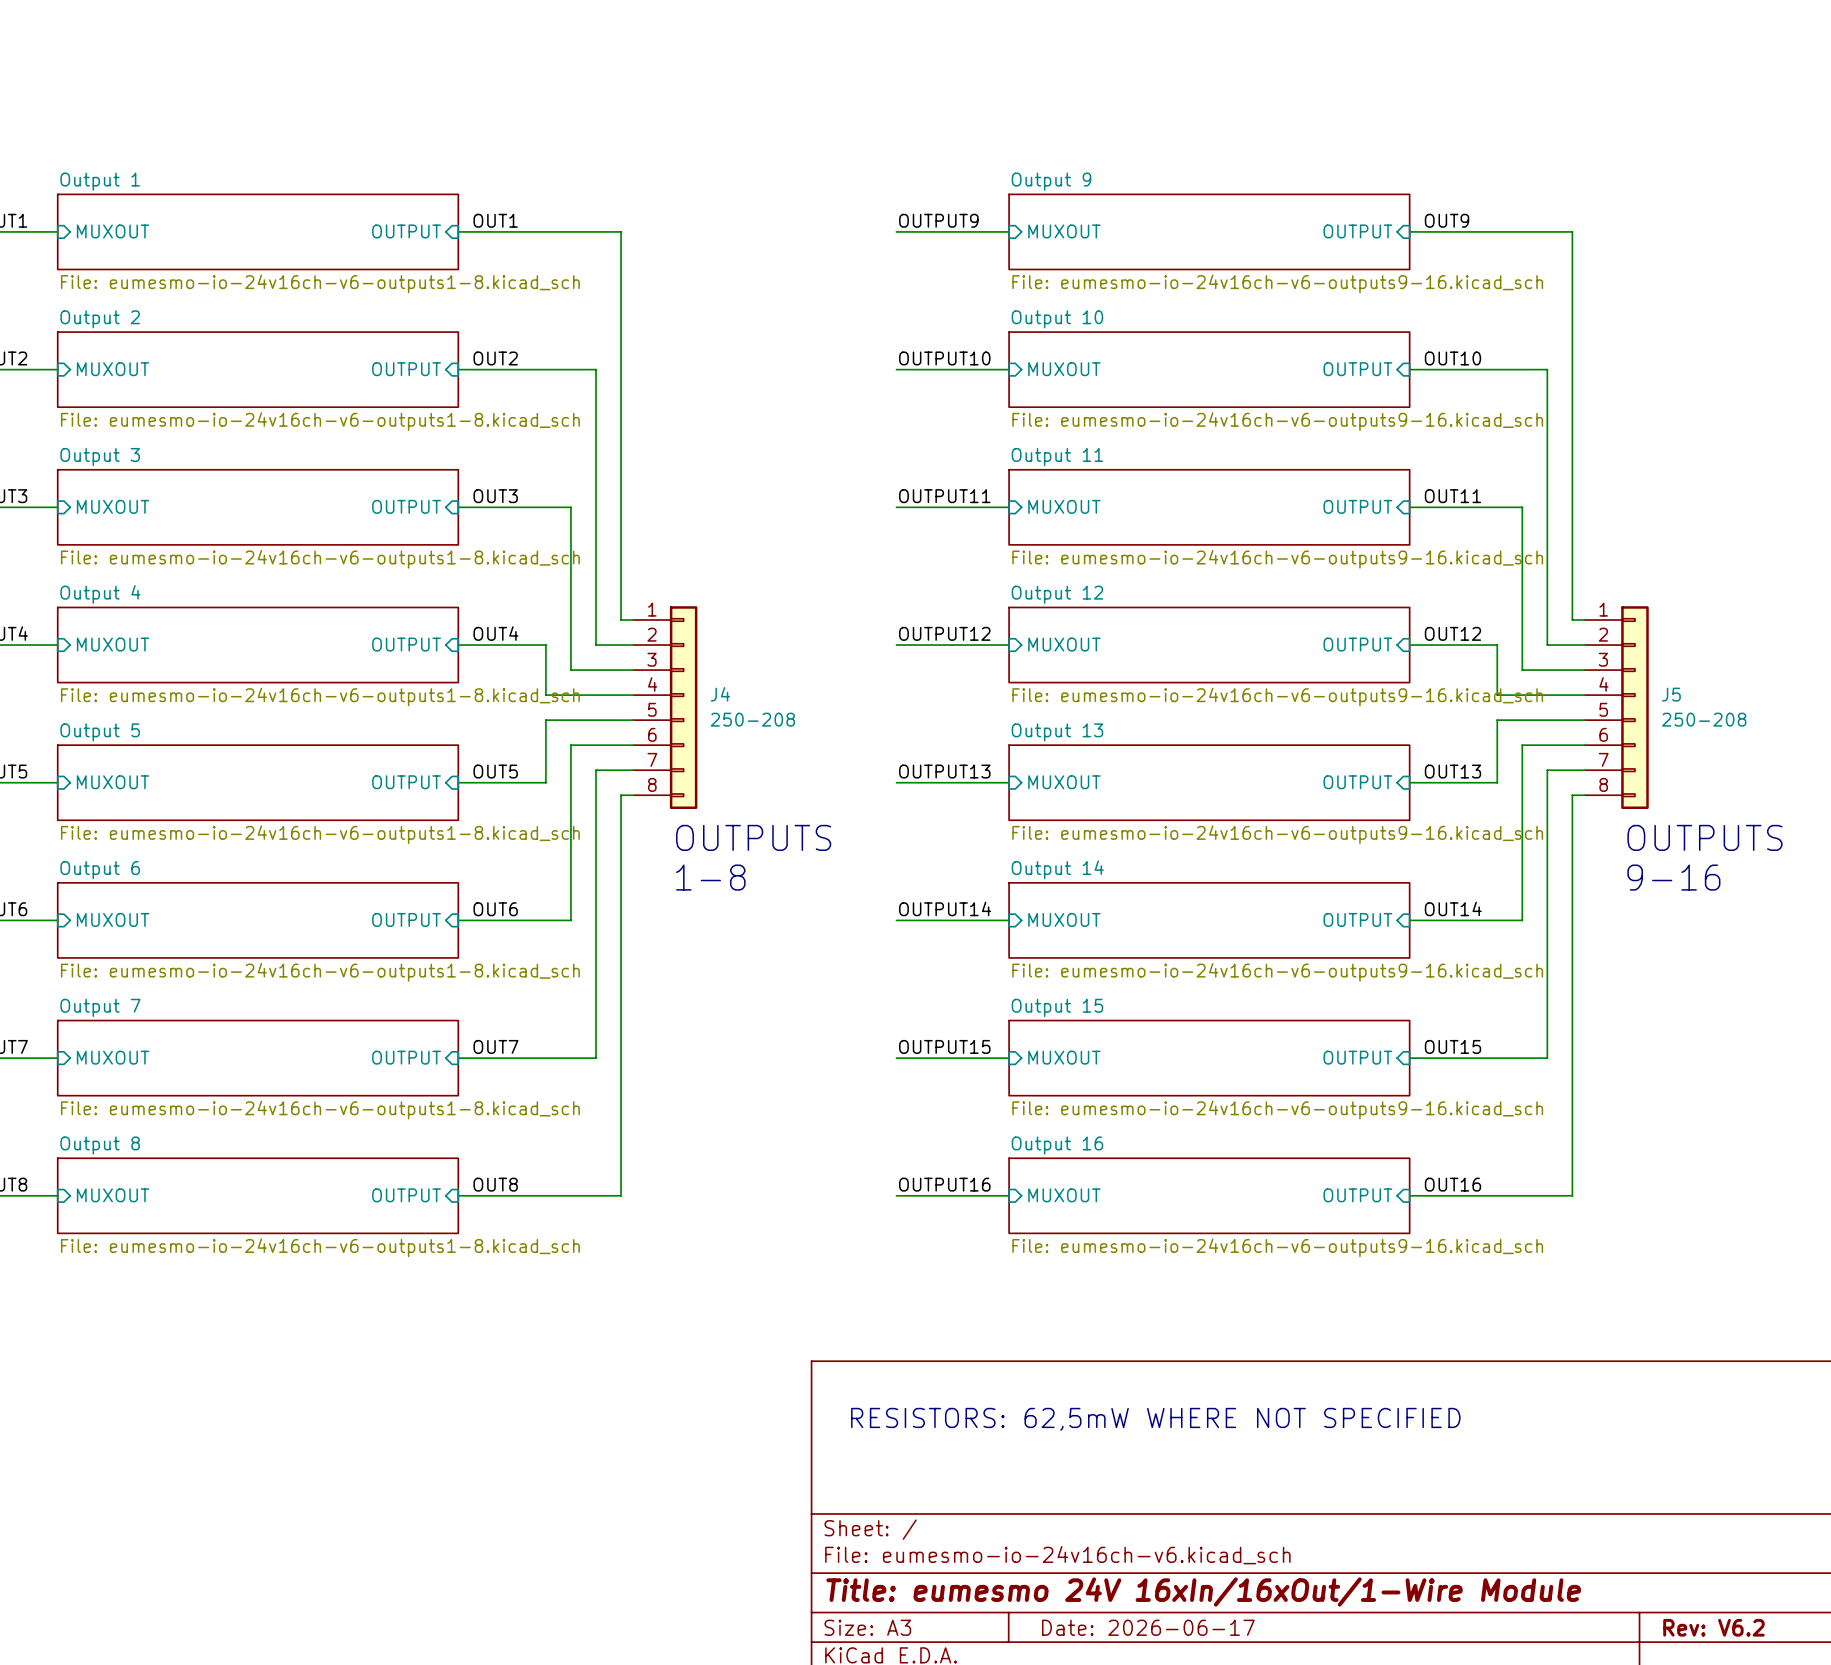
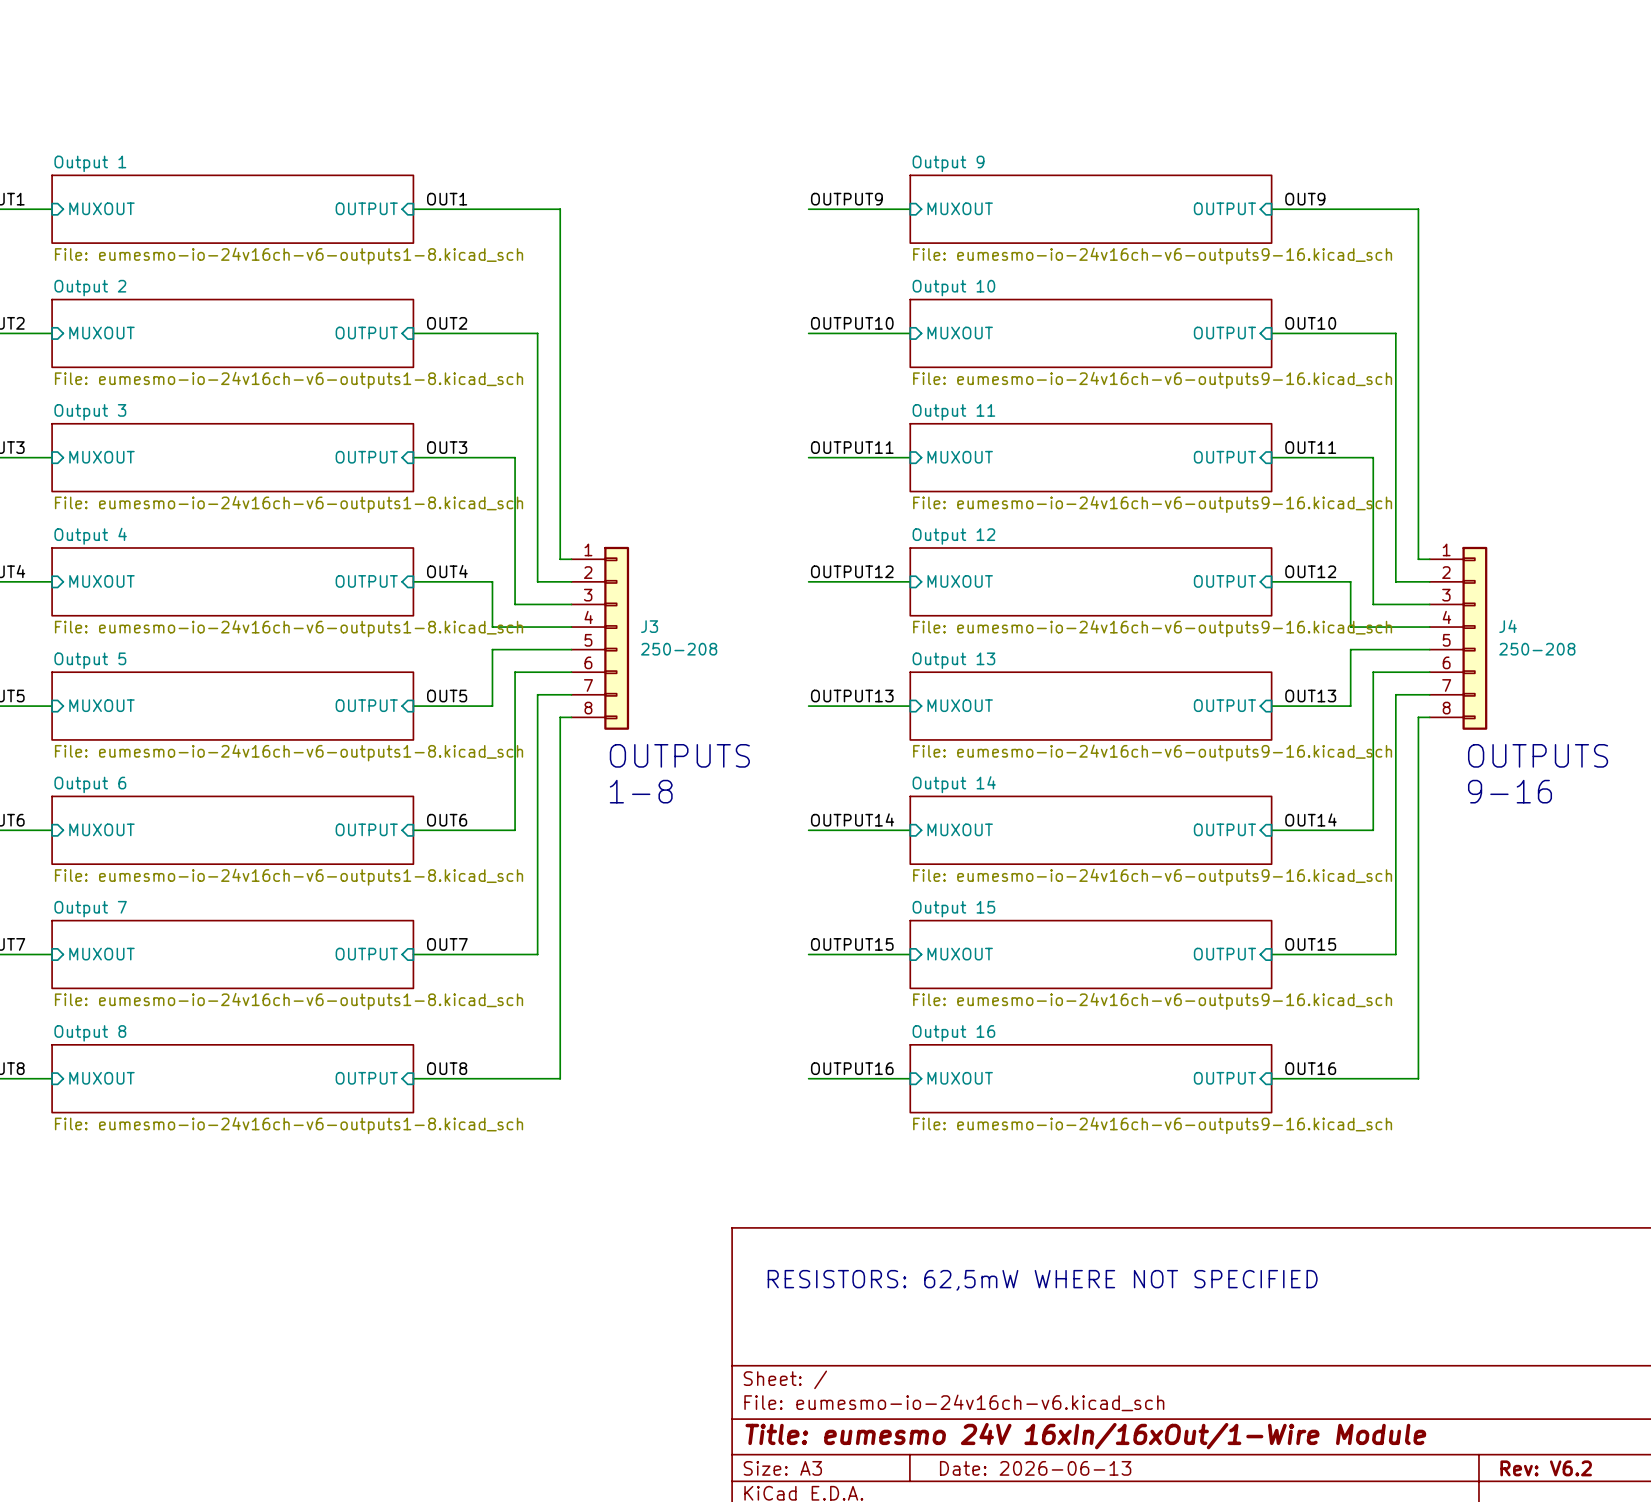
J4 name: J4 (720, 694) -> J3 (649, 626)
J5 name: J5 (1671, 694) -> J4 (1508, 626)
title block: Date: 2026-06-17 (1148, 1627) -> Date: 2026-06-13 (1035, 1468)

